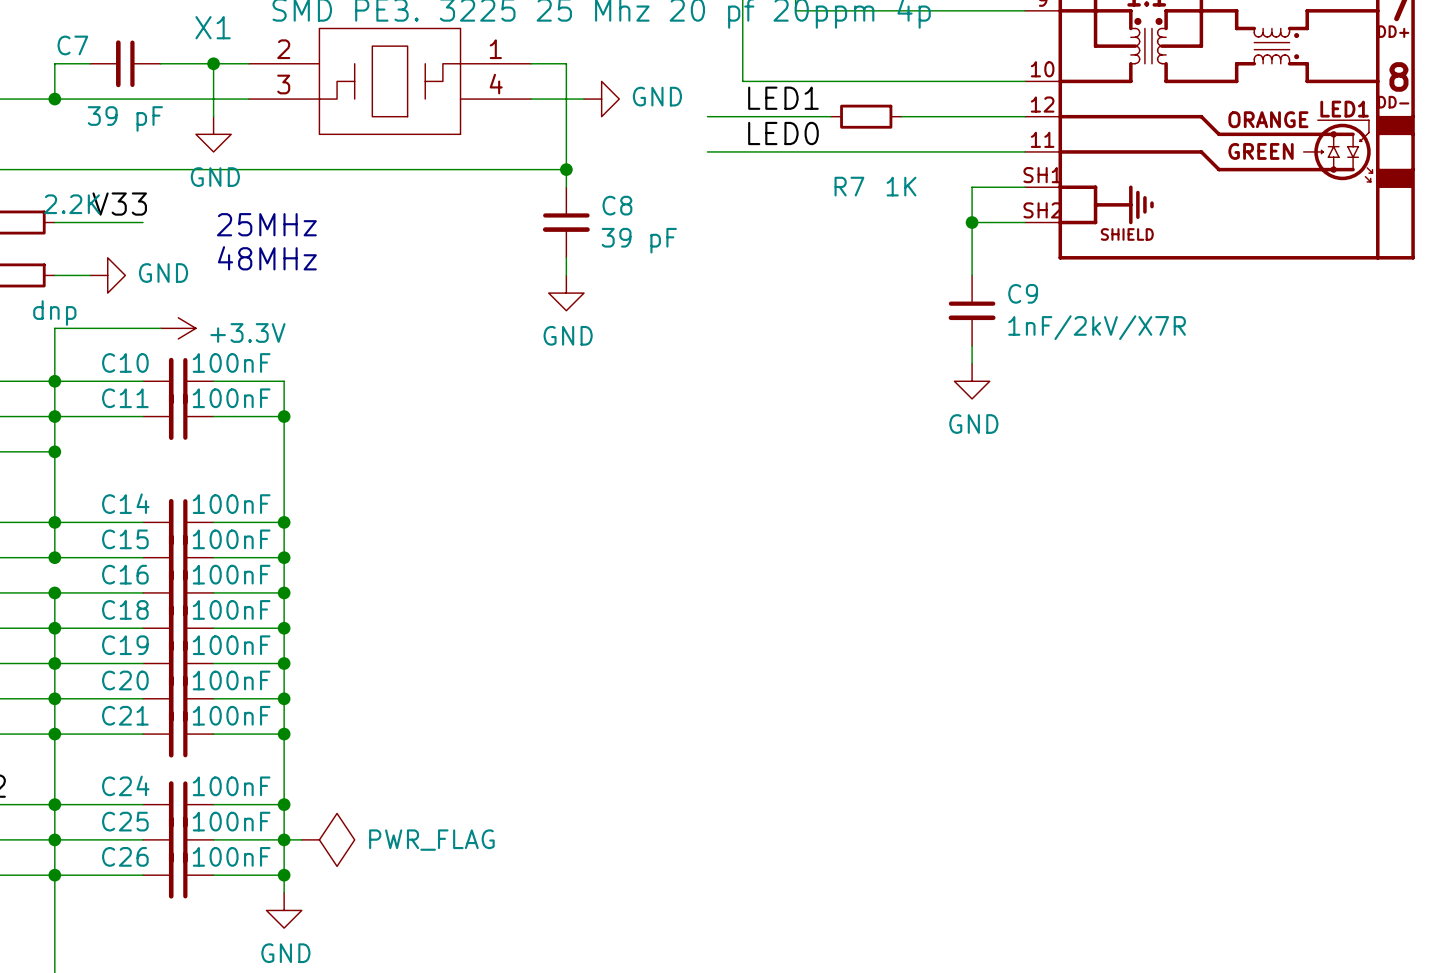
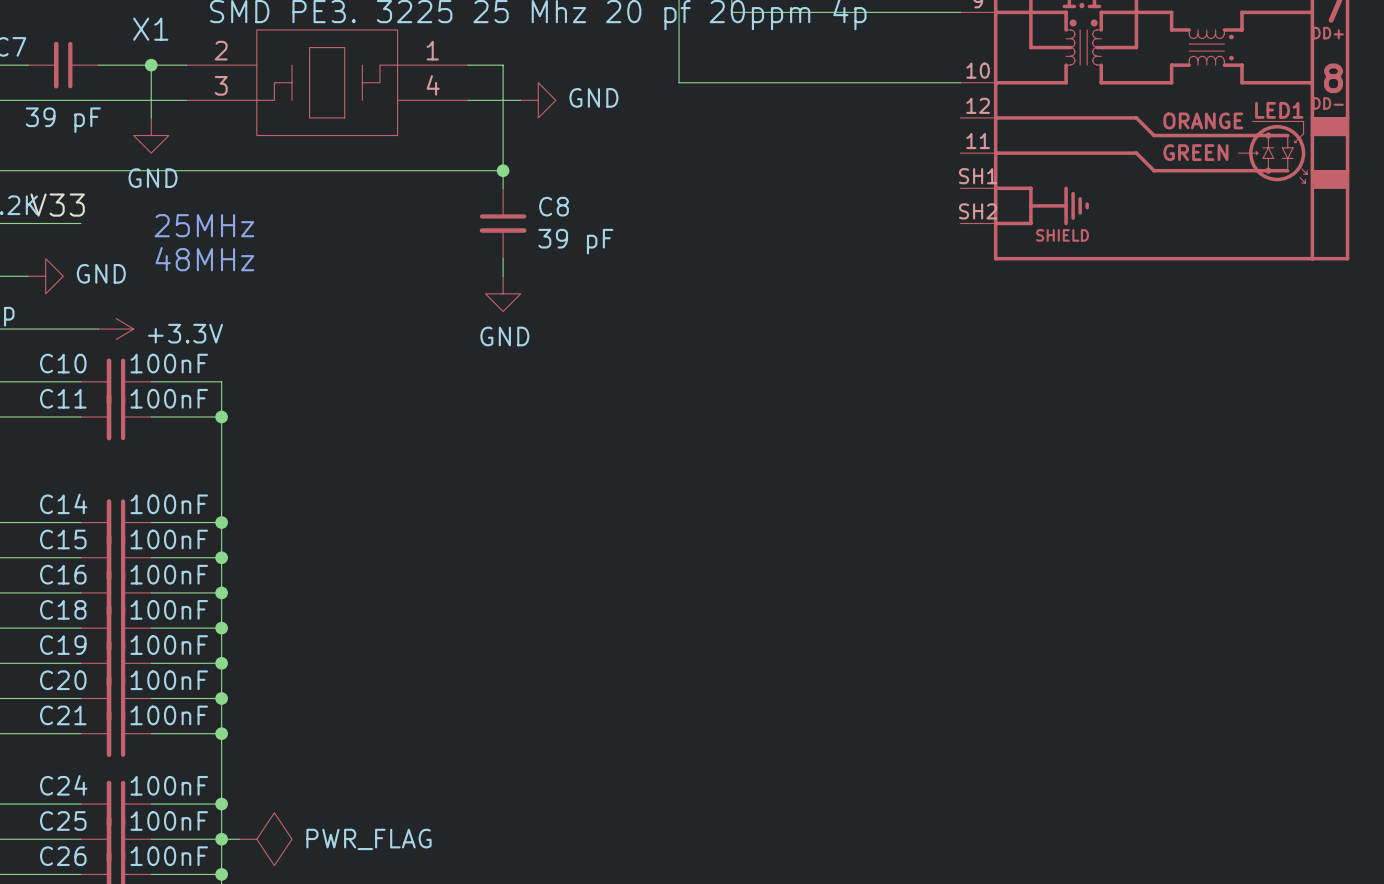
label: LED1 (783, 98) -> none
wire: (707, 116) (830, 116) -> none
R7: 1K (866, 116) -> none
wire: (901, 116) (1024, 116) -> none
label: LED0 (783, 133) -> none
wire: (707, 151) (1024, 151) -> none
wire: (1024, 187) (972, 187) (972, 275) -> none
wire: (972, 222) (1024, 222) -> none
junction: (972, 222) -> none
C9: 1nF/2kV/X7R (972, 310) -> none
wire: (972, 346) (972, 363) -> none
power symbol: GND (972, 381) -> none

